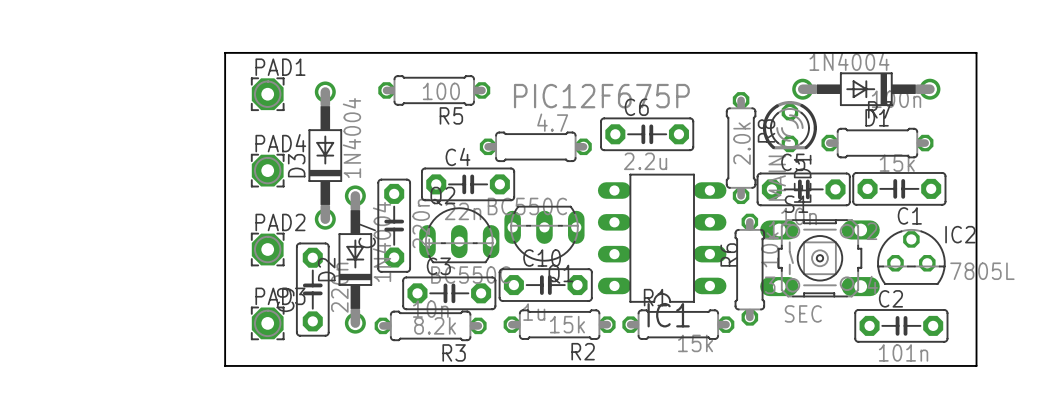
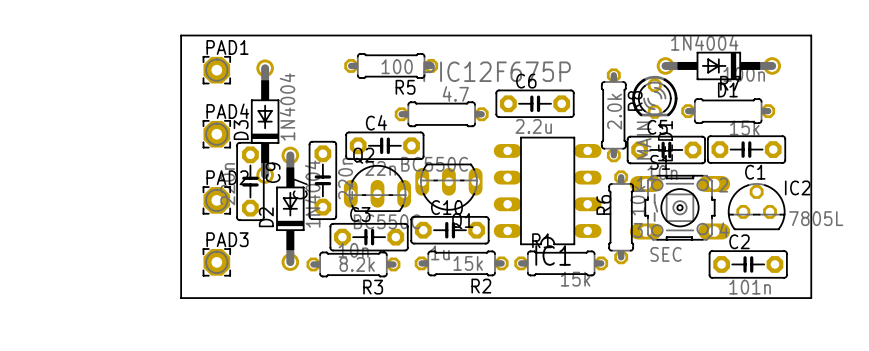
R5 position: (434, 90) -> (391, 65)
C9 rotation: 0° (312, 289) -> 180° (250, 181)
C9 position: (312, 289) -> (250, 181)

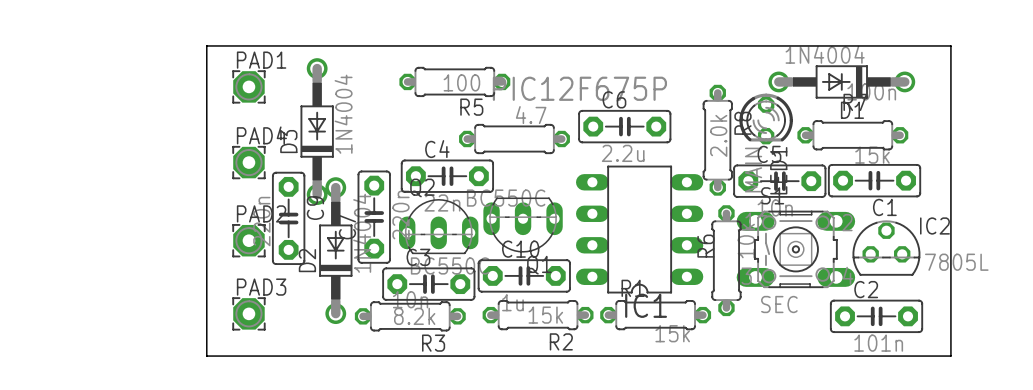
D3 position: (265, 121) -> (317, 131)

